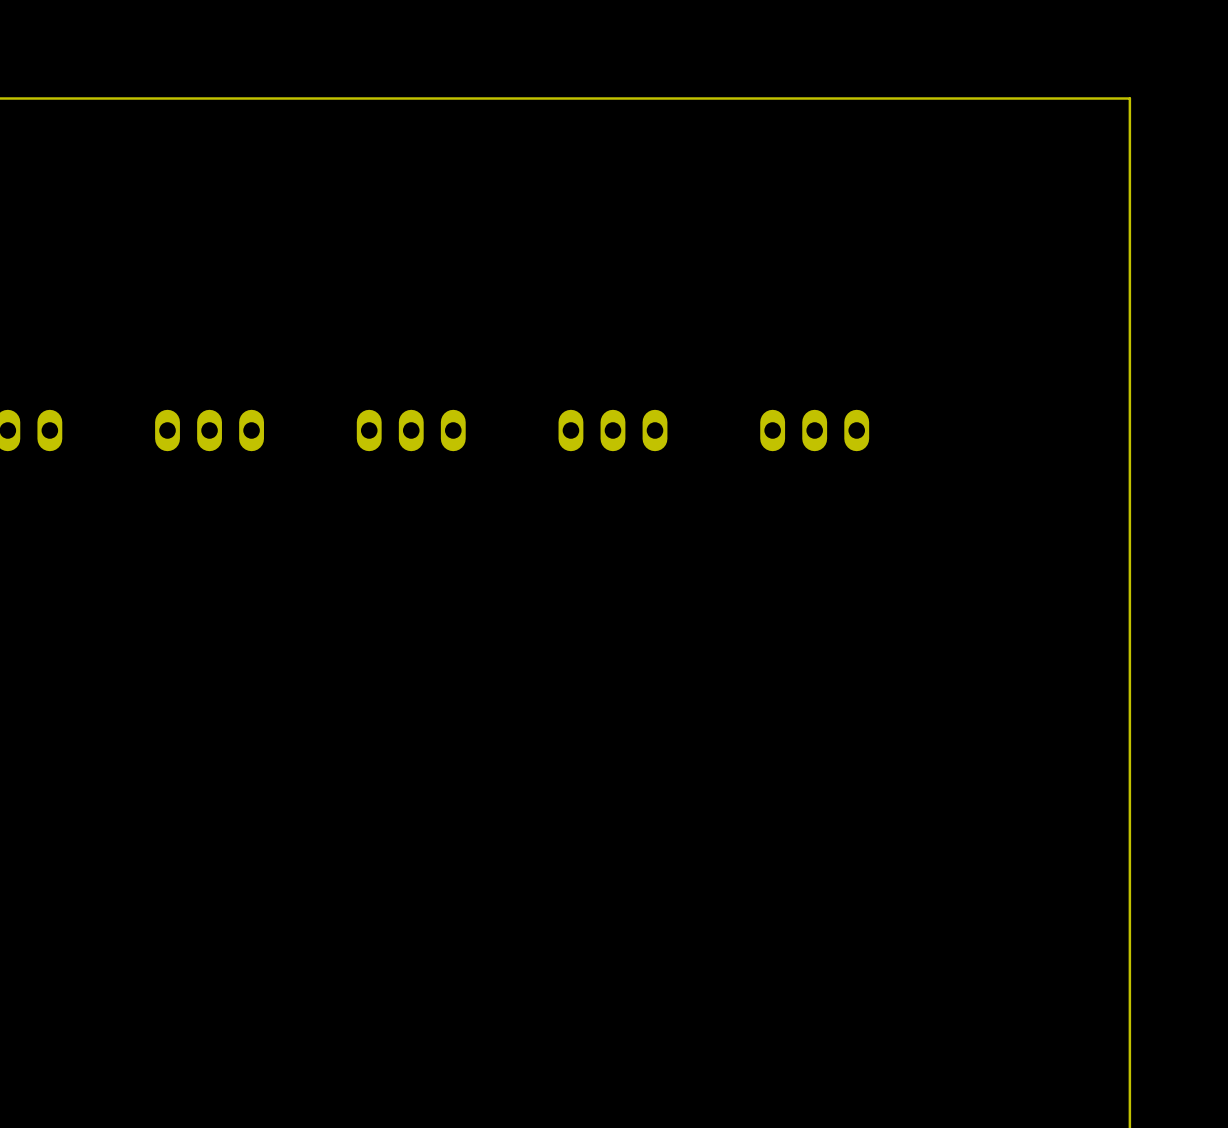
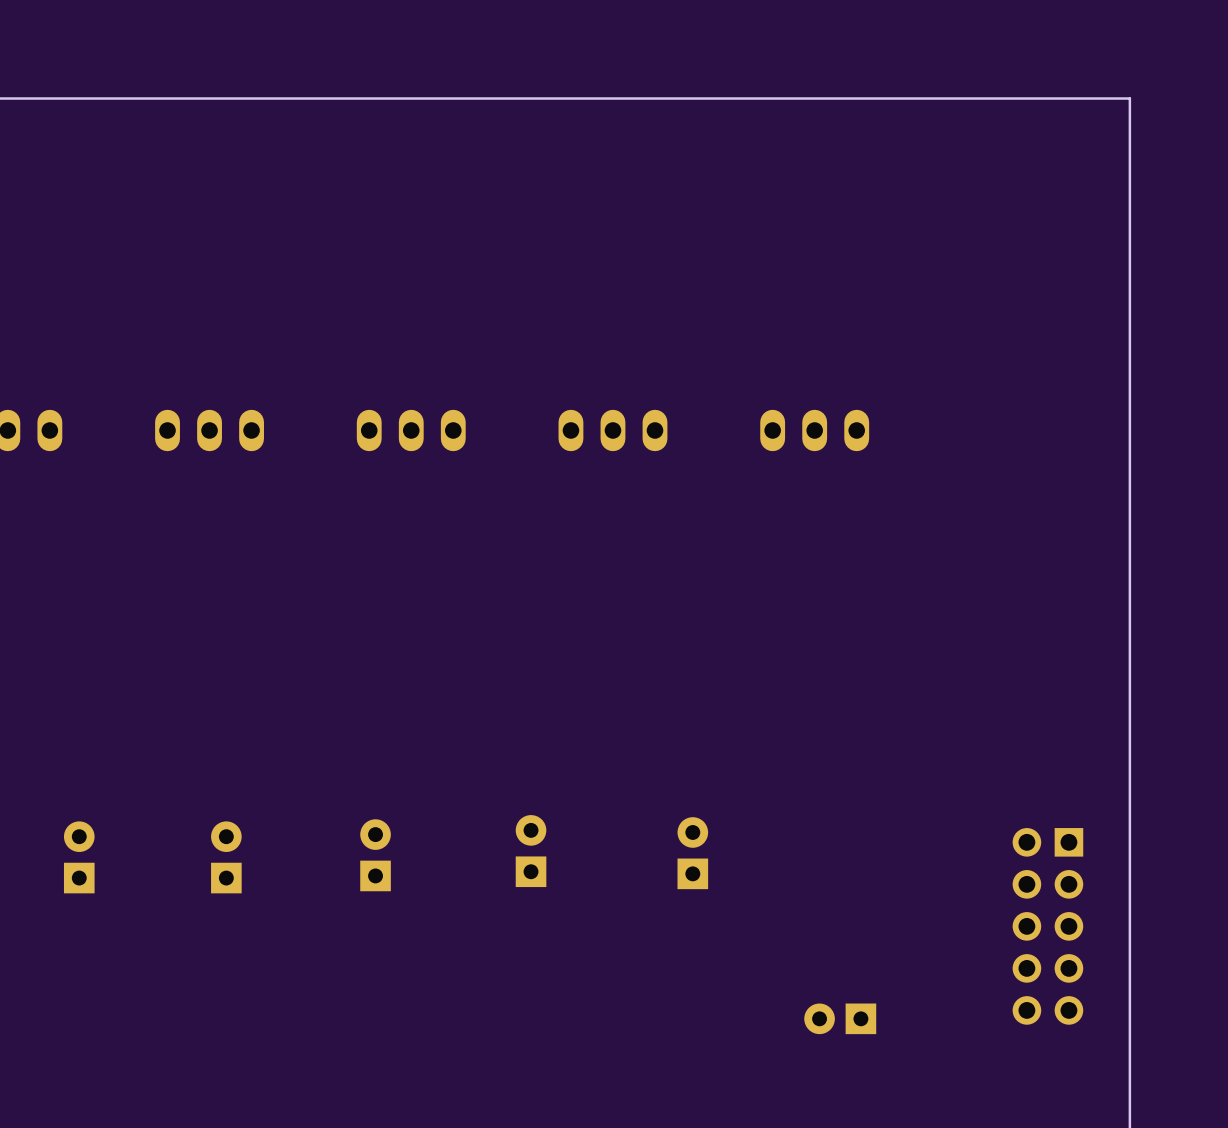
part: none -> (531, 851)
part: none -> (692, 853)
part: none -> (375, 855)
part: none -> (79, 857)
part: none -> (226, 857)
part: none -> (1047, 926)
part: none -> (840, 1018)

